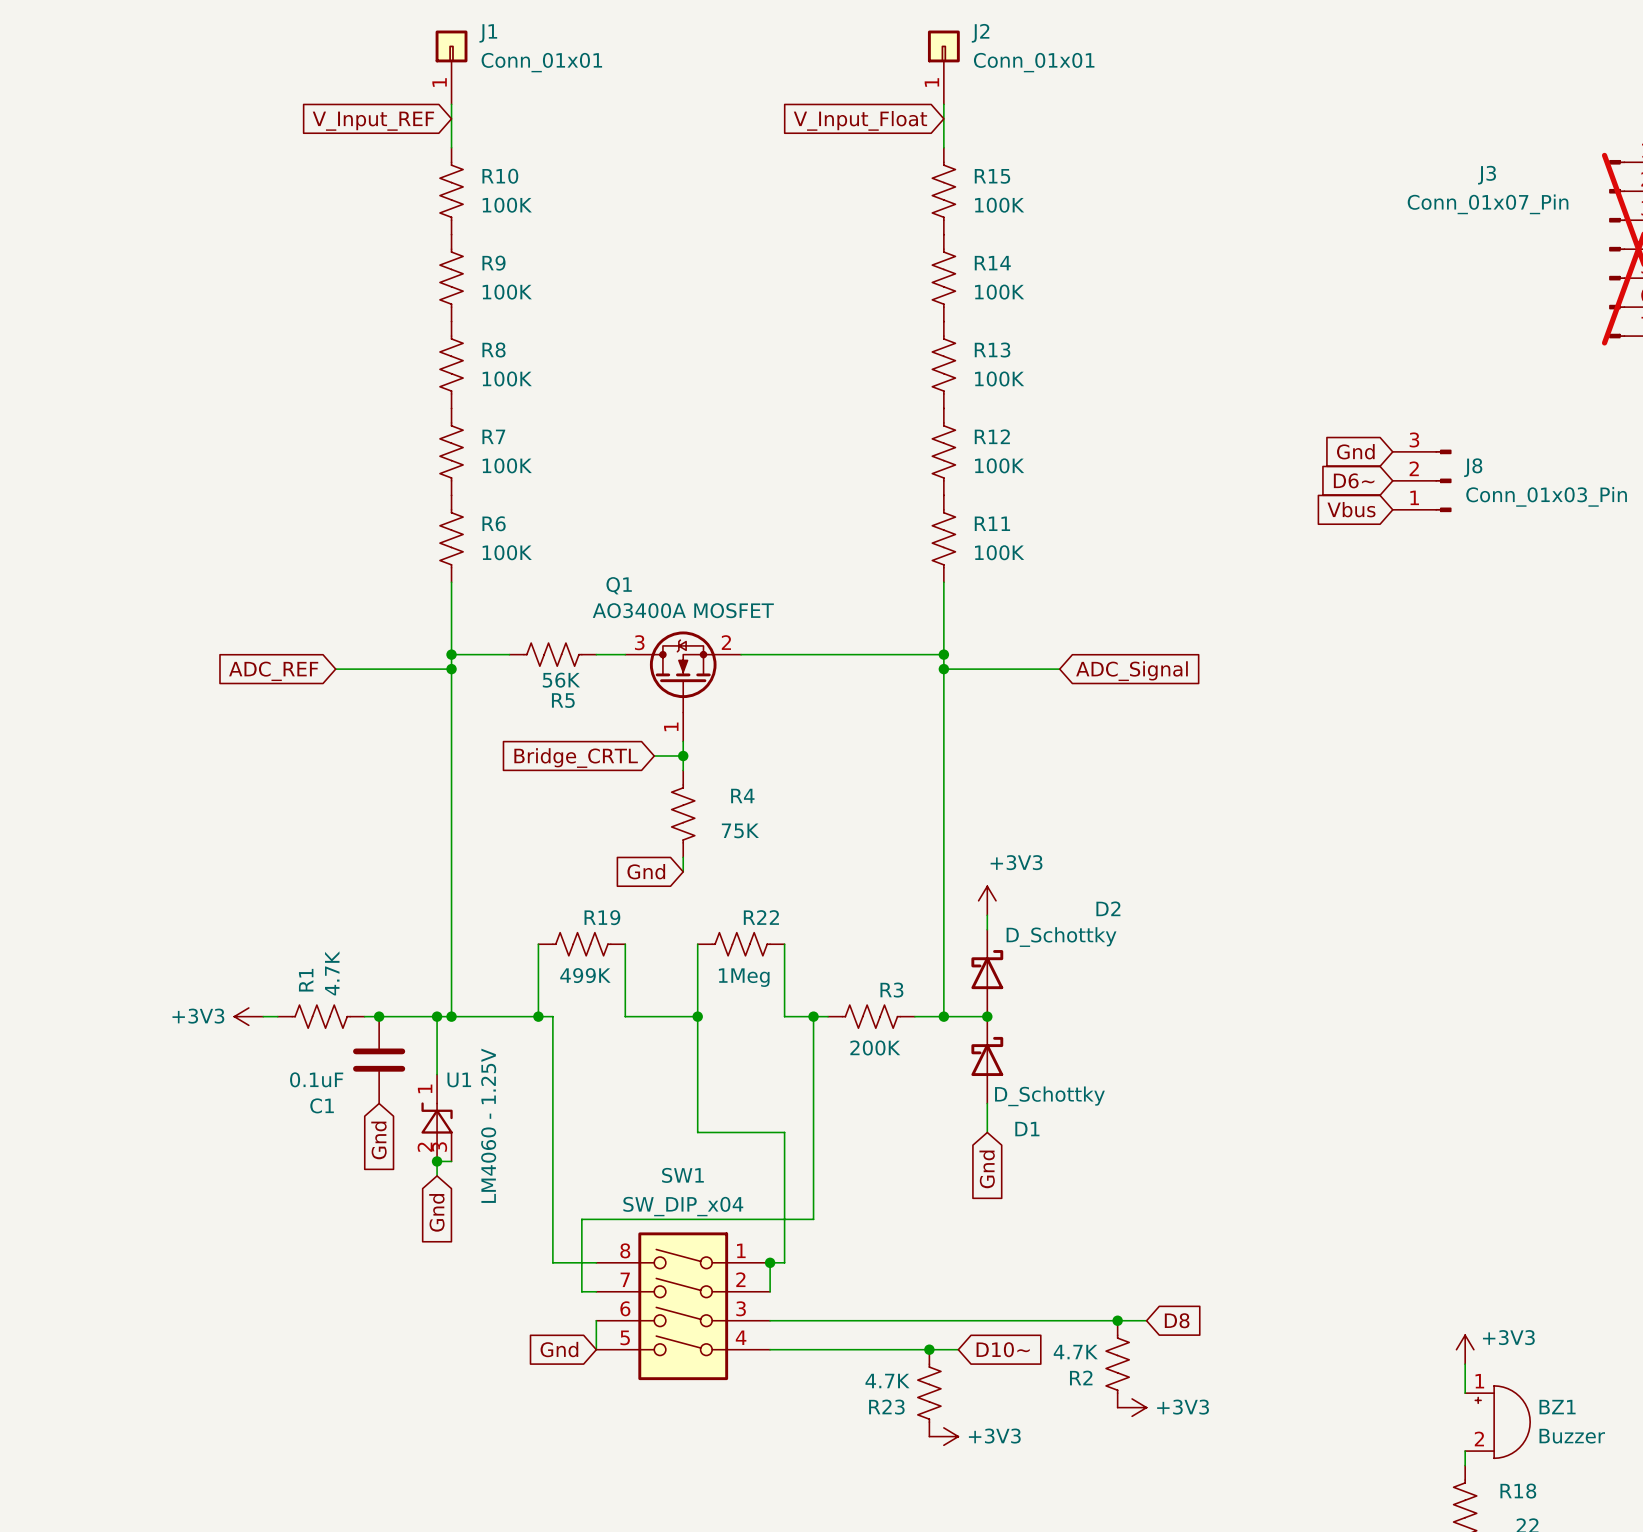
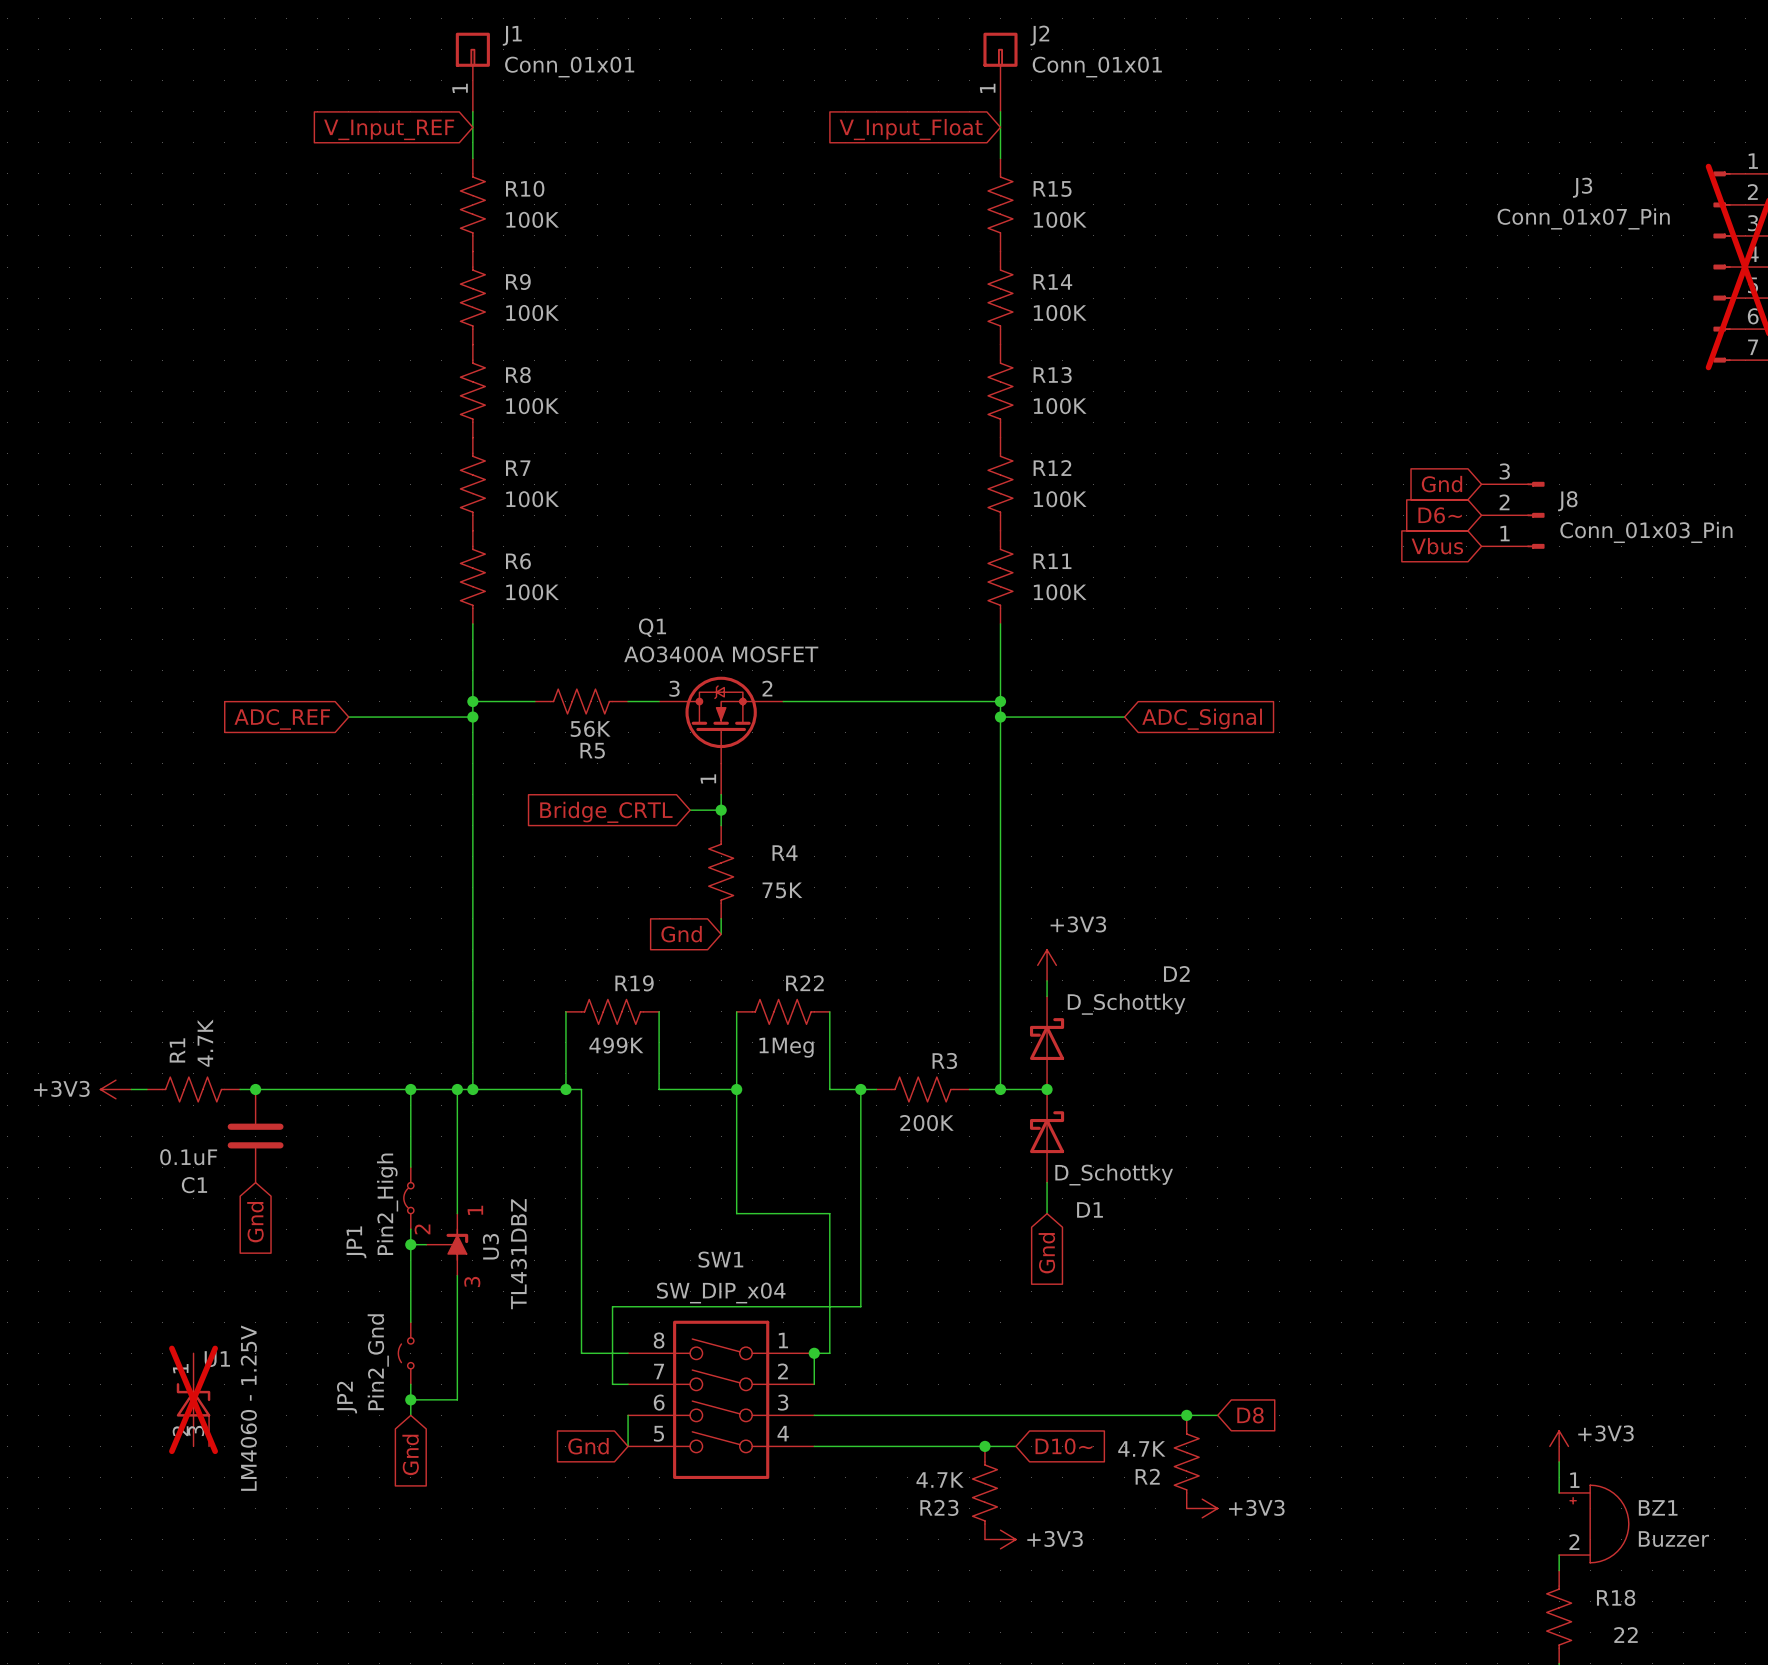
wire: none -> (131, 1089) (146, 1089)
junction: none -> (255, 1089)
power symbol position: +3V3 (248, 1016) -> +3V3 (115, 1089)
R1 position: (321, 1016) -> (193, 1089)
junction position: (379, 1016) -> (410, 1089)
wire: none -> (410, 1089) (410, 1167)
C1 position: (379, 1060) -> (255, 1136)
JP1: none -> Pin2_High (408, 1198)
U1 position: (437, 1118) -> (193, 1399)
global label: none -> Gnd (255, 1222)
global label: Gnd (378, 1140) -> none
wire: none -> (410, 1229) (410, 1322)
wire: none -> (410, 1244) (426, 1244)
U3: none -> TL431DBZ (447, 1244)
junction position: (437, 1161) -> (410, 1244)
wire: none -> (457, 1275) (457, 1399) (410, 1399)
global label: Gnd (436, 1212) -> none
JP2: none -> Pin2_Gnd (406, 1353)
wire: none -> (410, 1384) (410, 1415)
U1 do-not-place cross: none -> (193, 1399)
junction: none -> (410, 1399)
global label: none -> Gnd (410, 1454)

